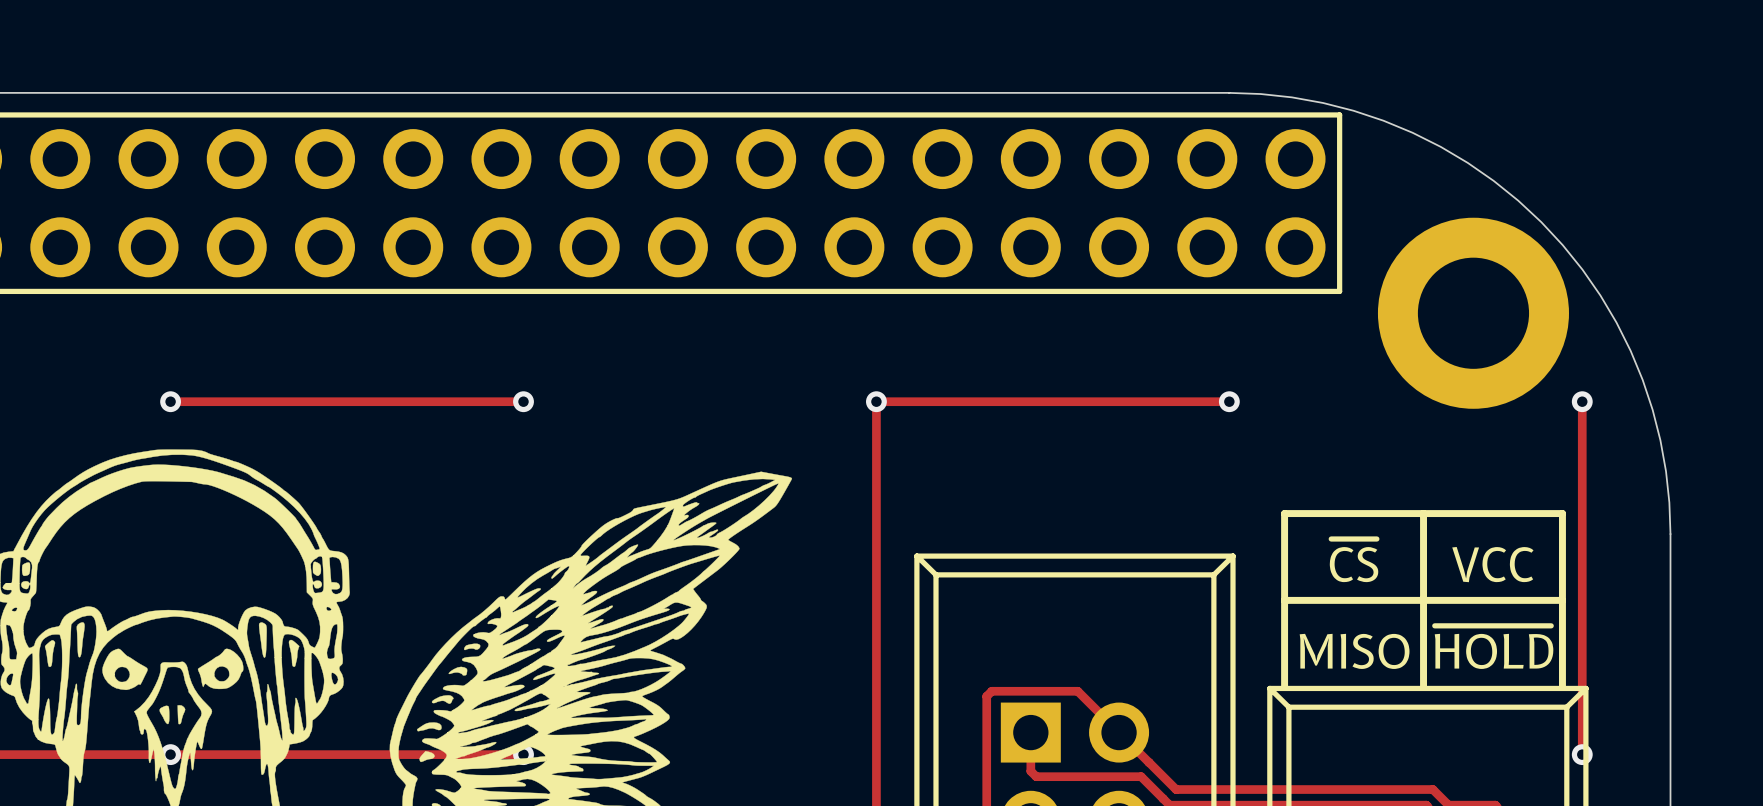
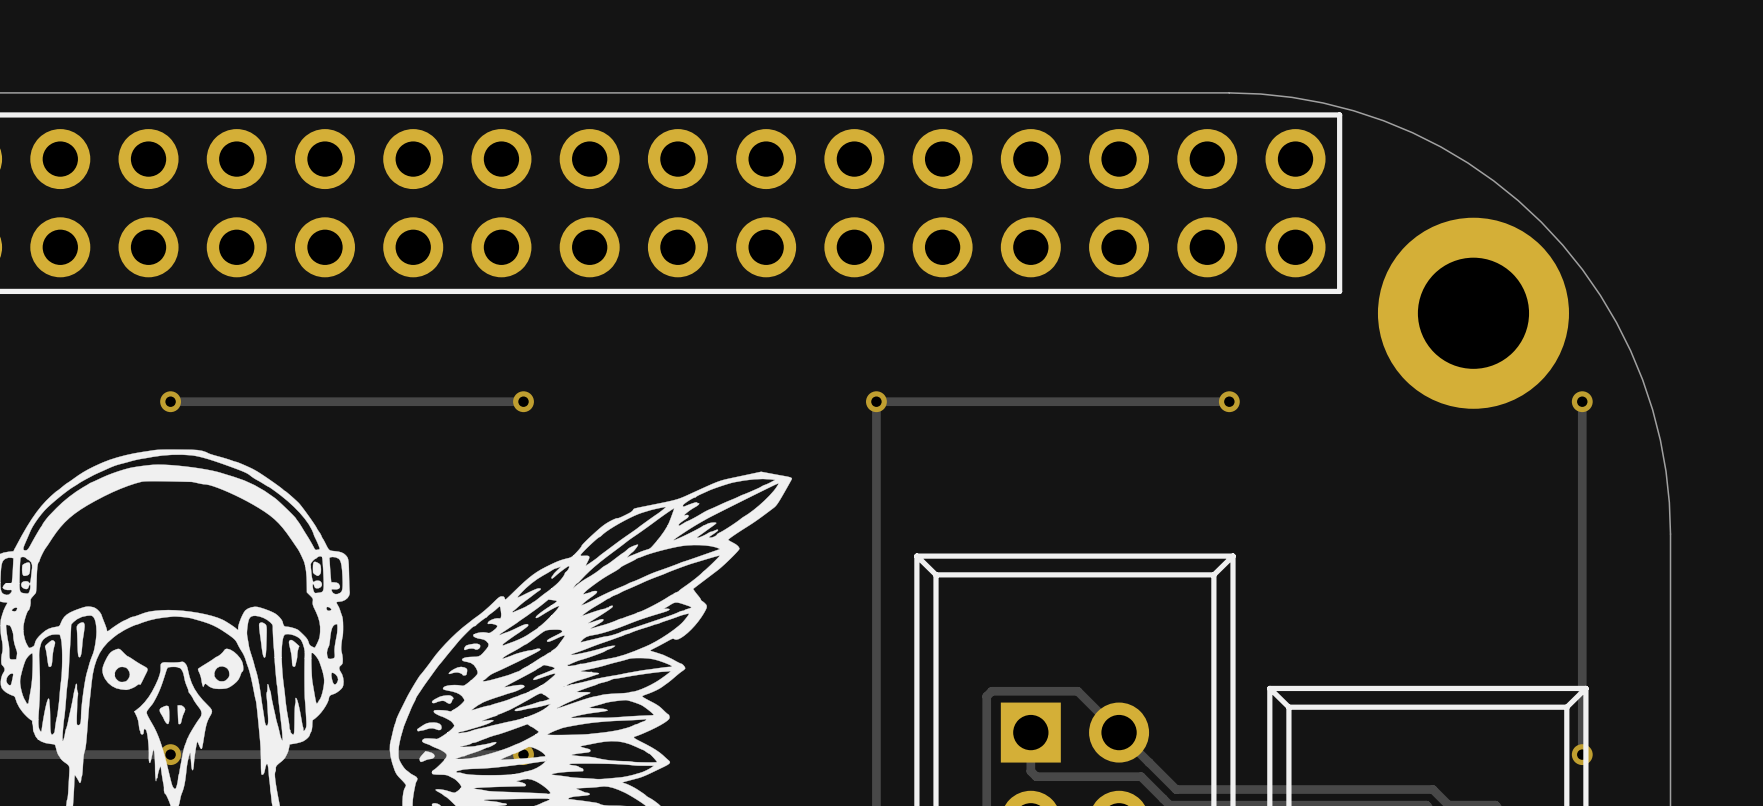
line: (1423, 513) (1423, 687) -> none
text: ~{CS} (1354, 560) -> none
text: VCC (1492, 564) -> none
line: (1284, 600) (1562, 600) -> none
text: ~{HOLD} (1494, 647) -> none
text: MISO (1354, 651) -> none
line: (1284, 687) (1284, 513) (1562, 513) (1562, 687) -> none

